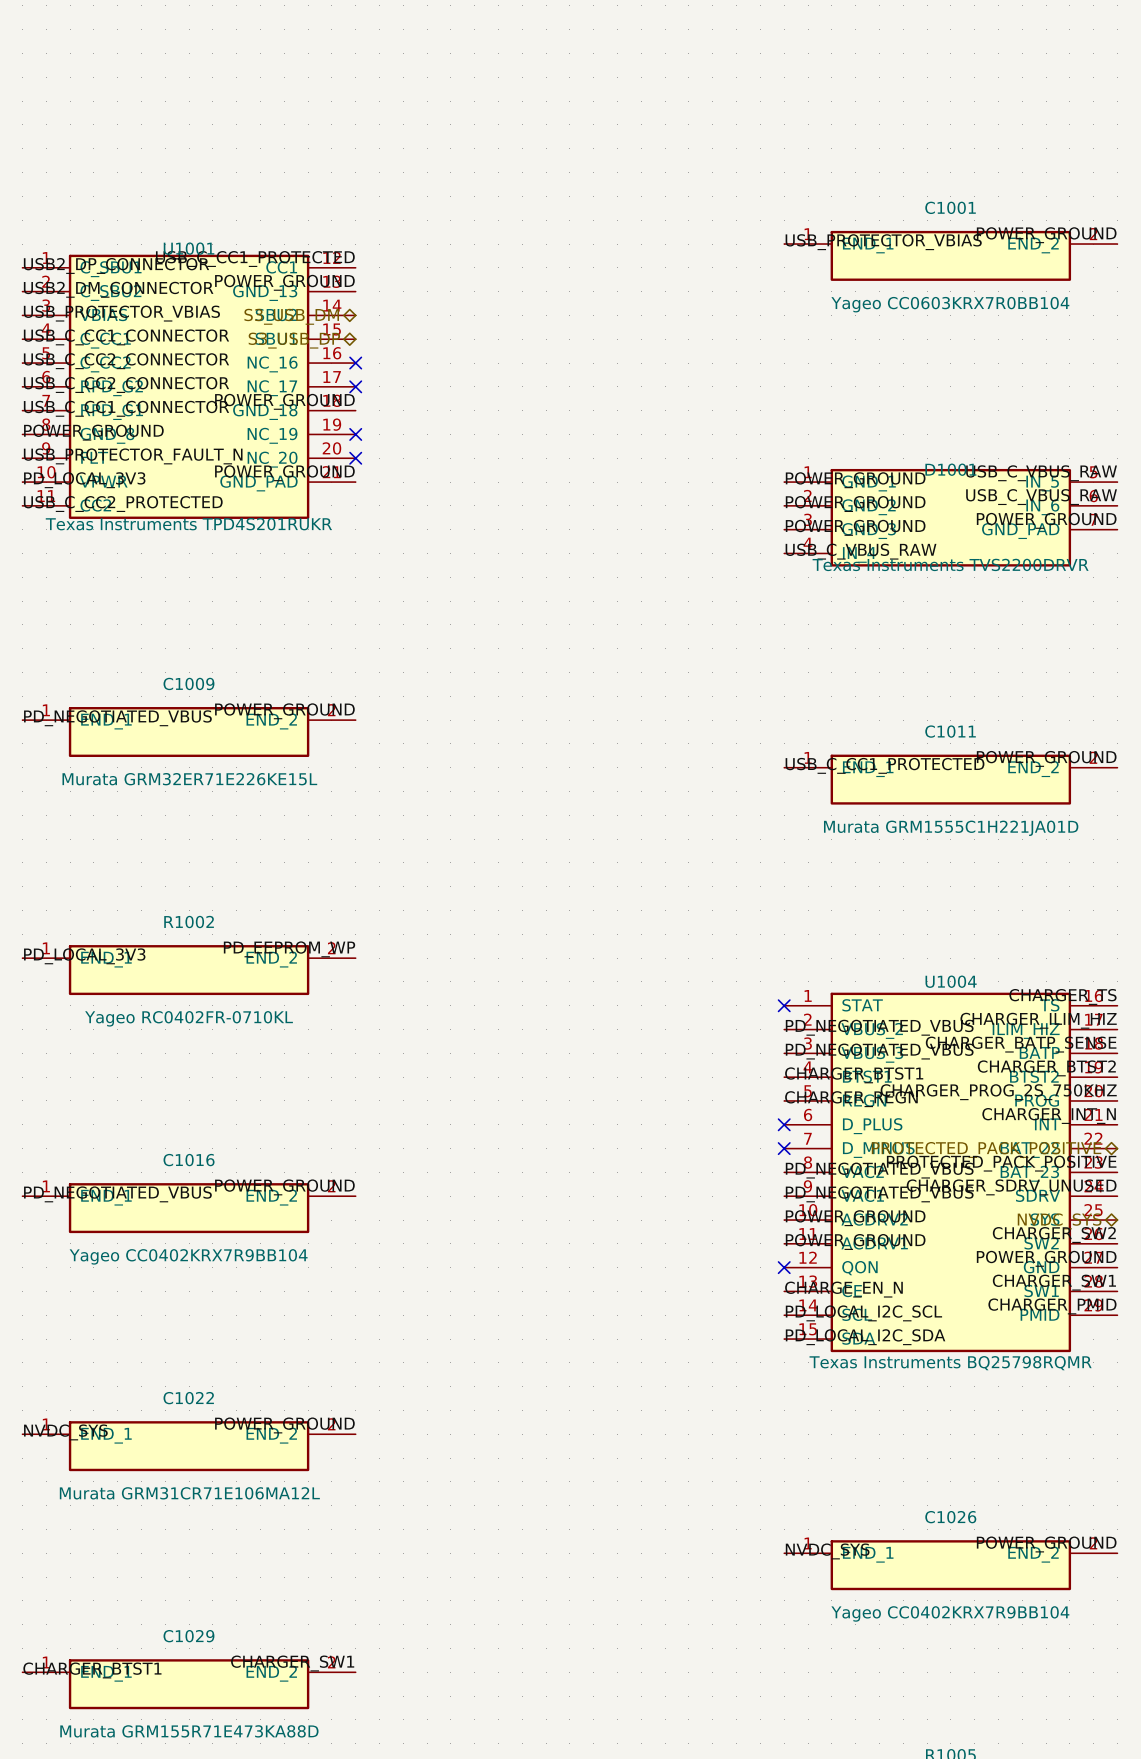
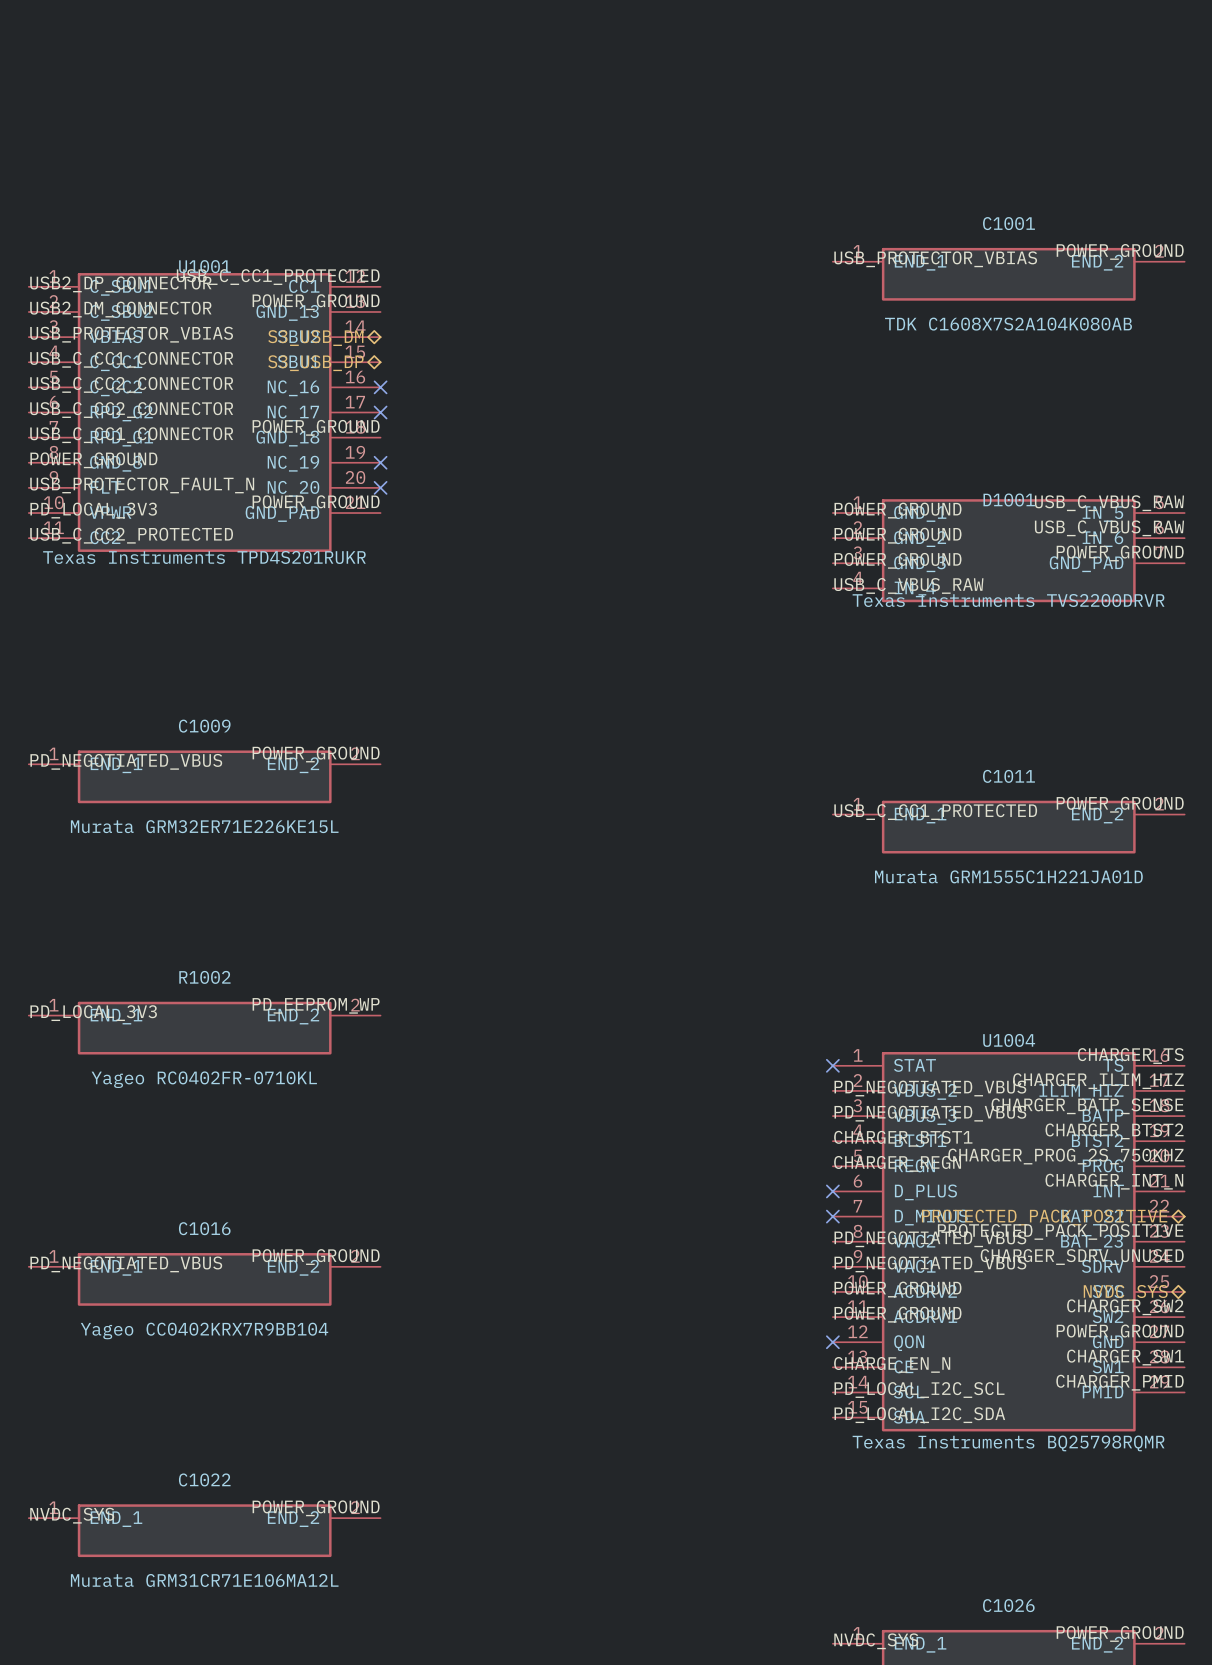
C1001 value: Yageo CC0603KRX7R0BB104 (950, 304) -> TDK C1608X7S2A104K080AB (1008, 324)

